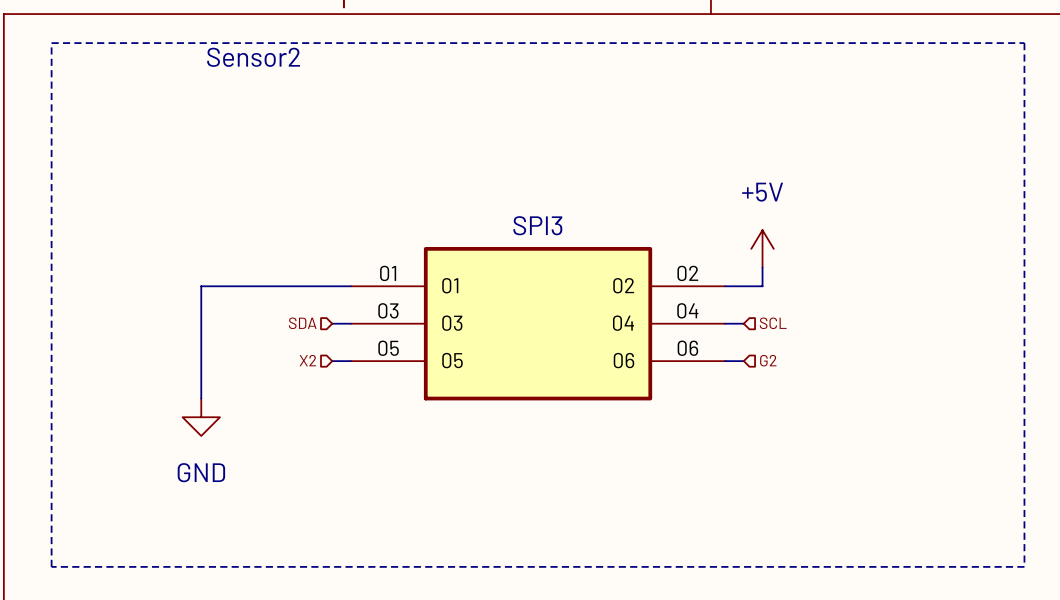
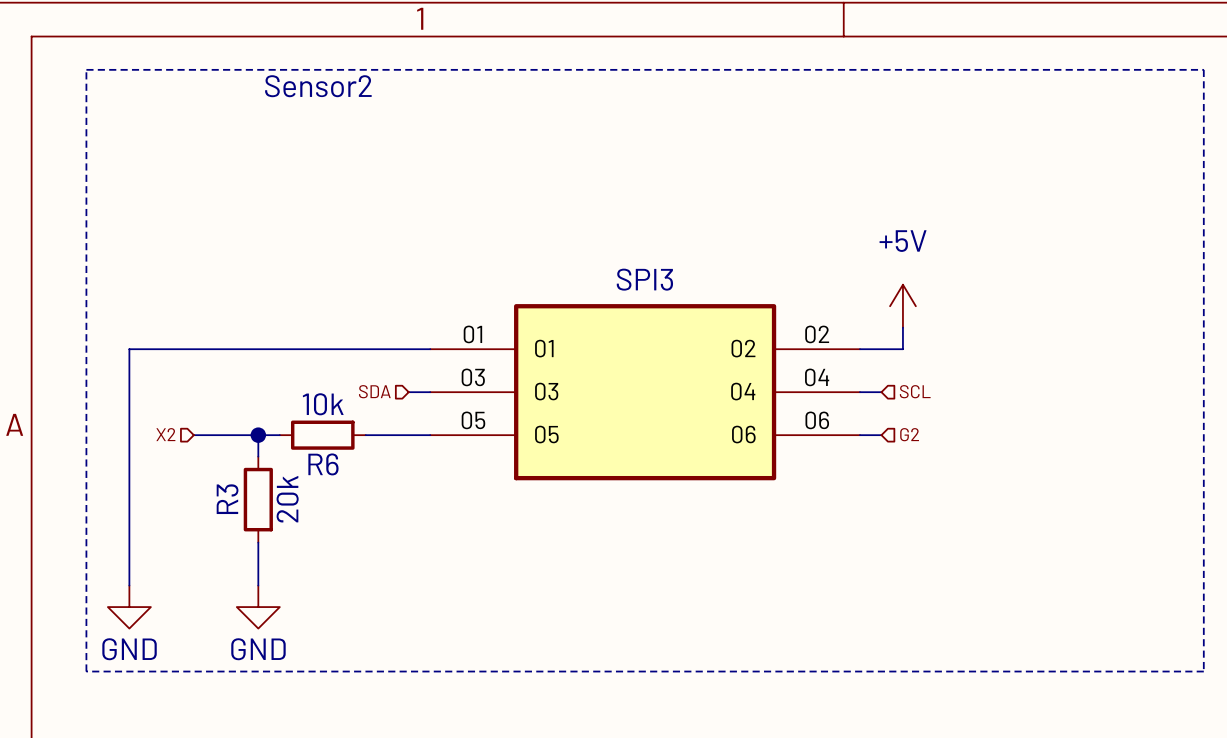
wire: (201, 286) (201, 361) -> (258, 349) (129, 349) (129, 585)
hierarchical label position: X2 (307, 360) -> X2 (165, 434)
wire: none -> (193, 435) (279, 435)
junction: none -> (258, 435)
R6: none -> 10k (322, 435)
wire: none -> (365, 435) (408, 435)
power symbol: GND (201, 417) -> none
R3: none -> 20k (258, 499)
wire: none -> (258, 542) (258, 585)
power symbol: none -> GND (129, 607)
power symbol: none -> GND (258, 607)

